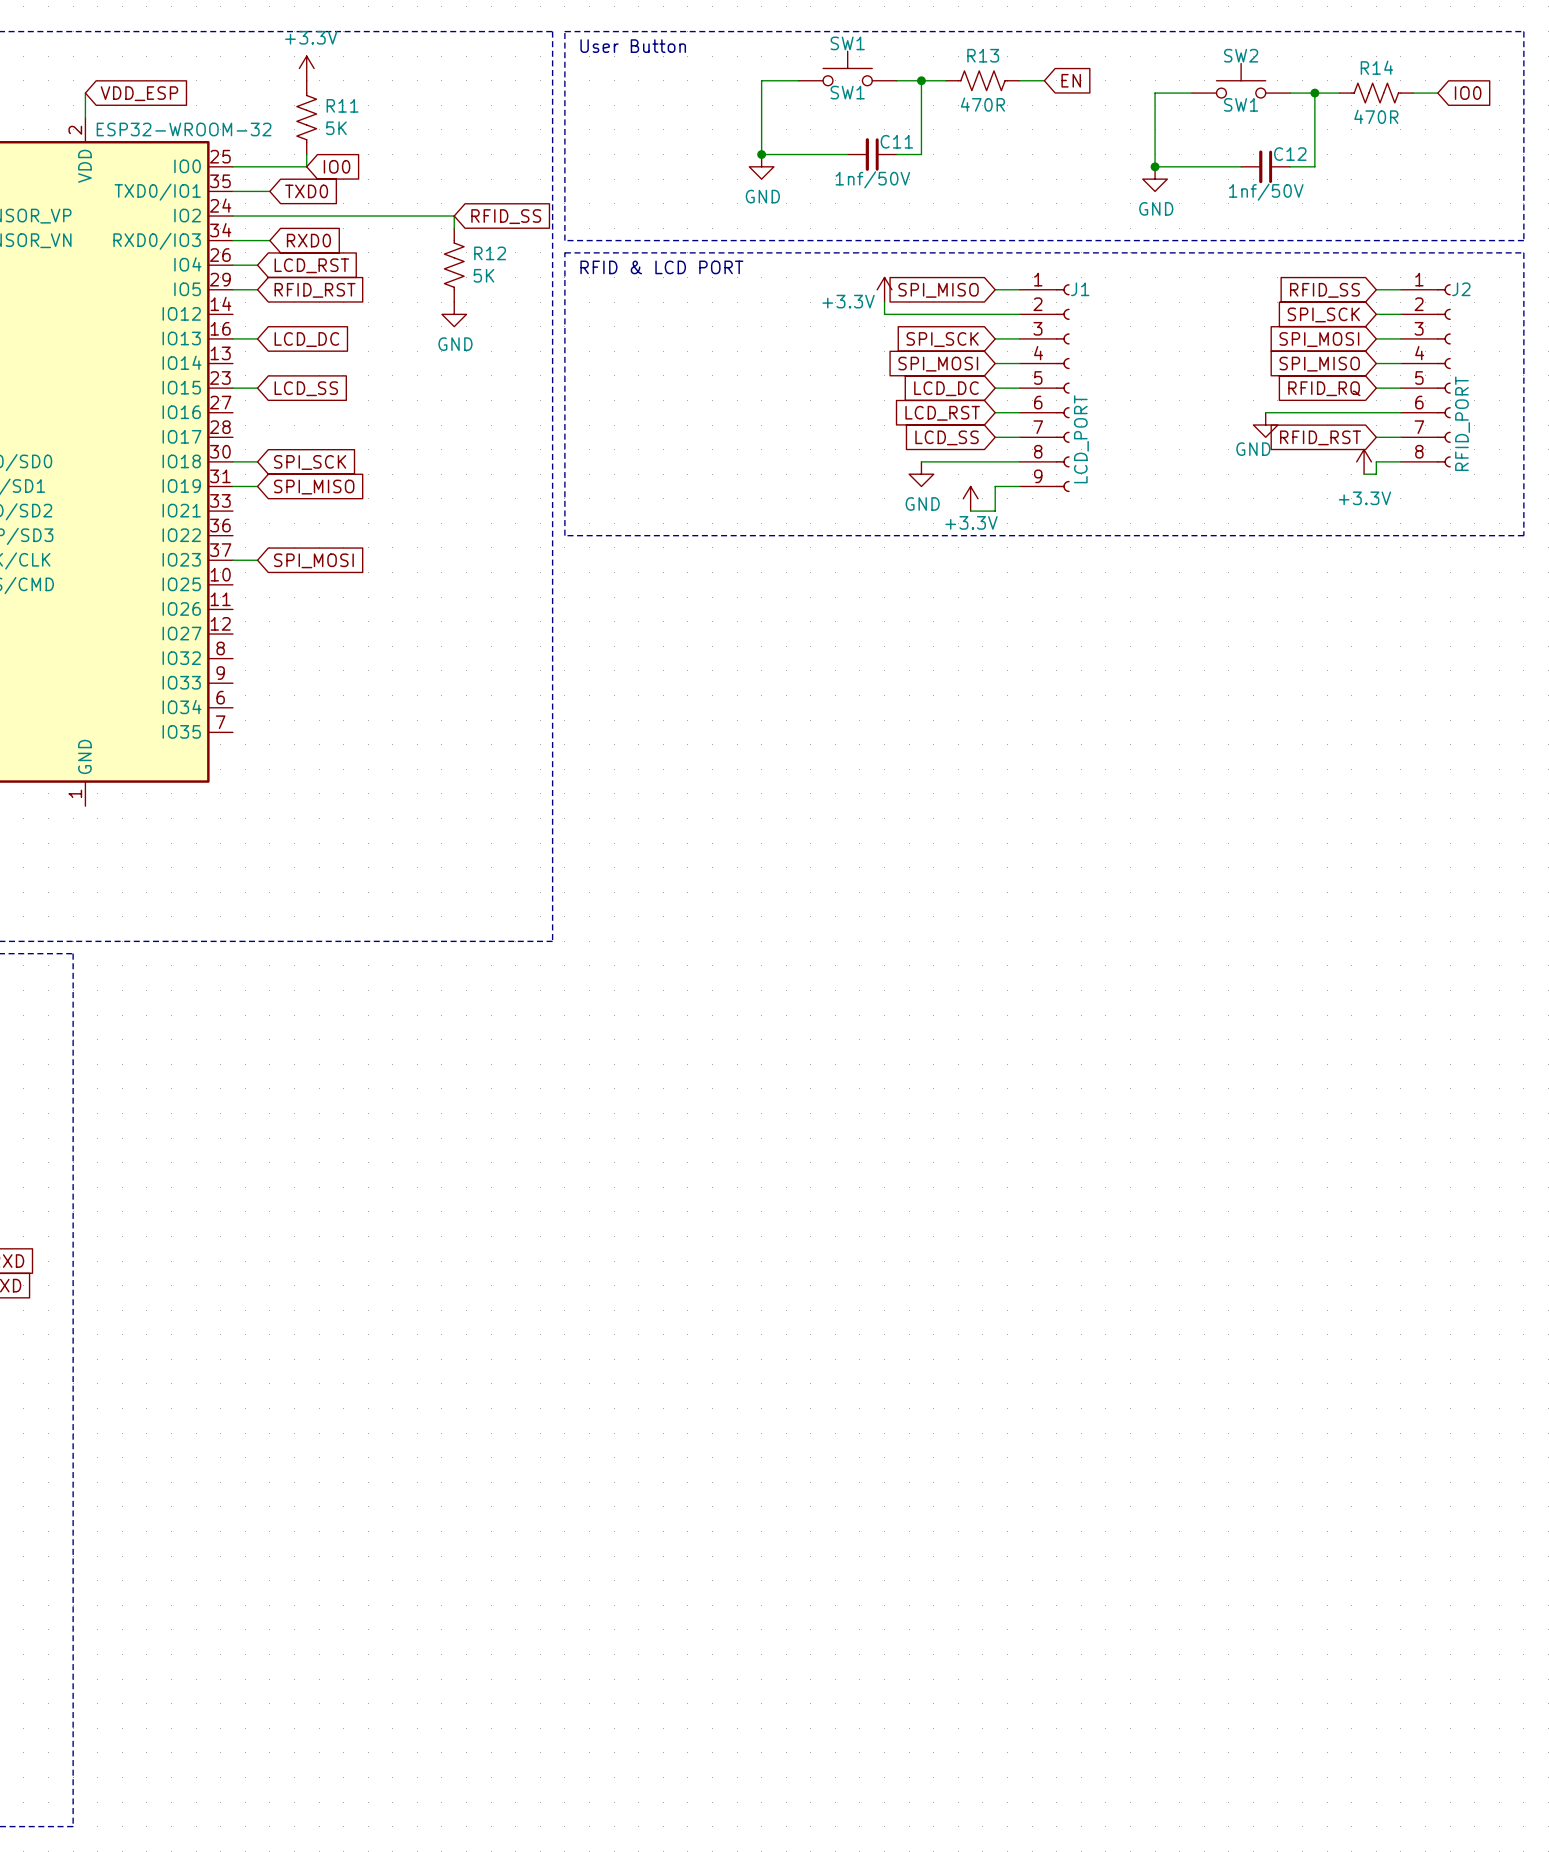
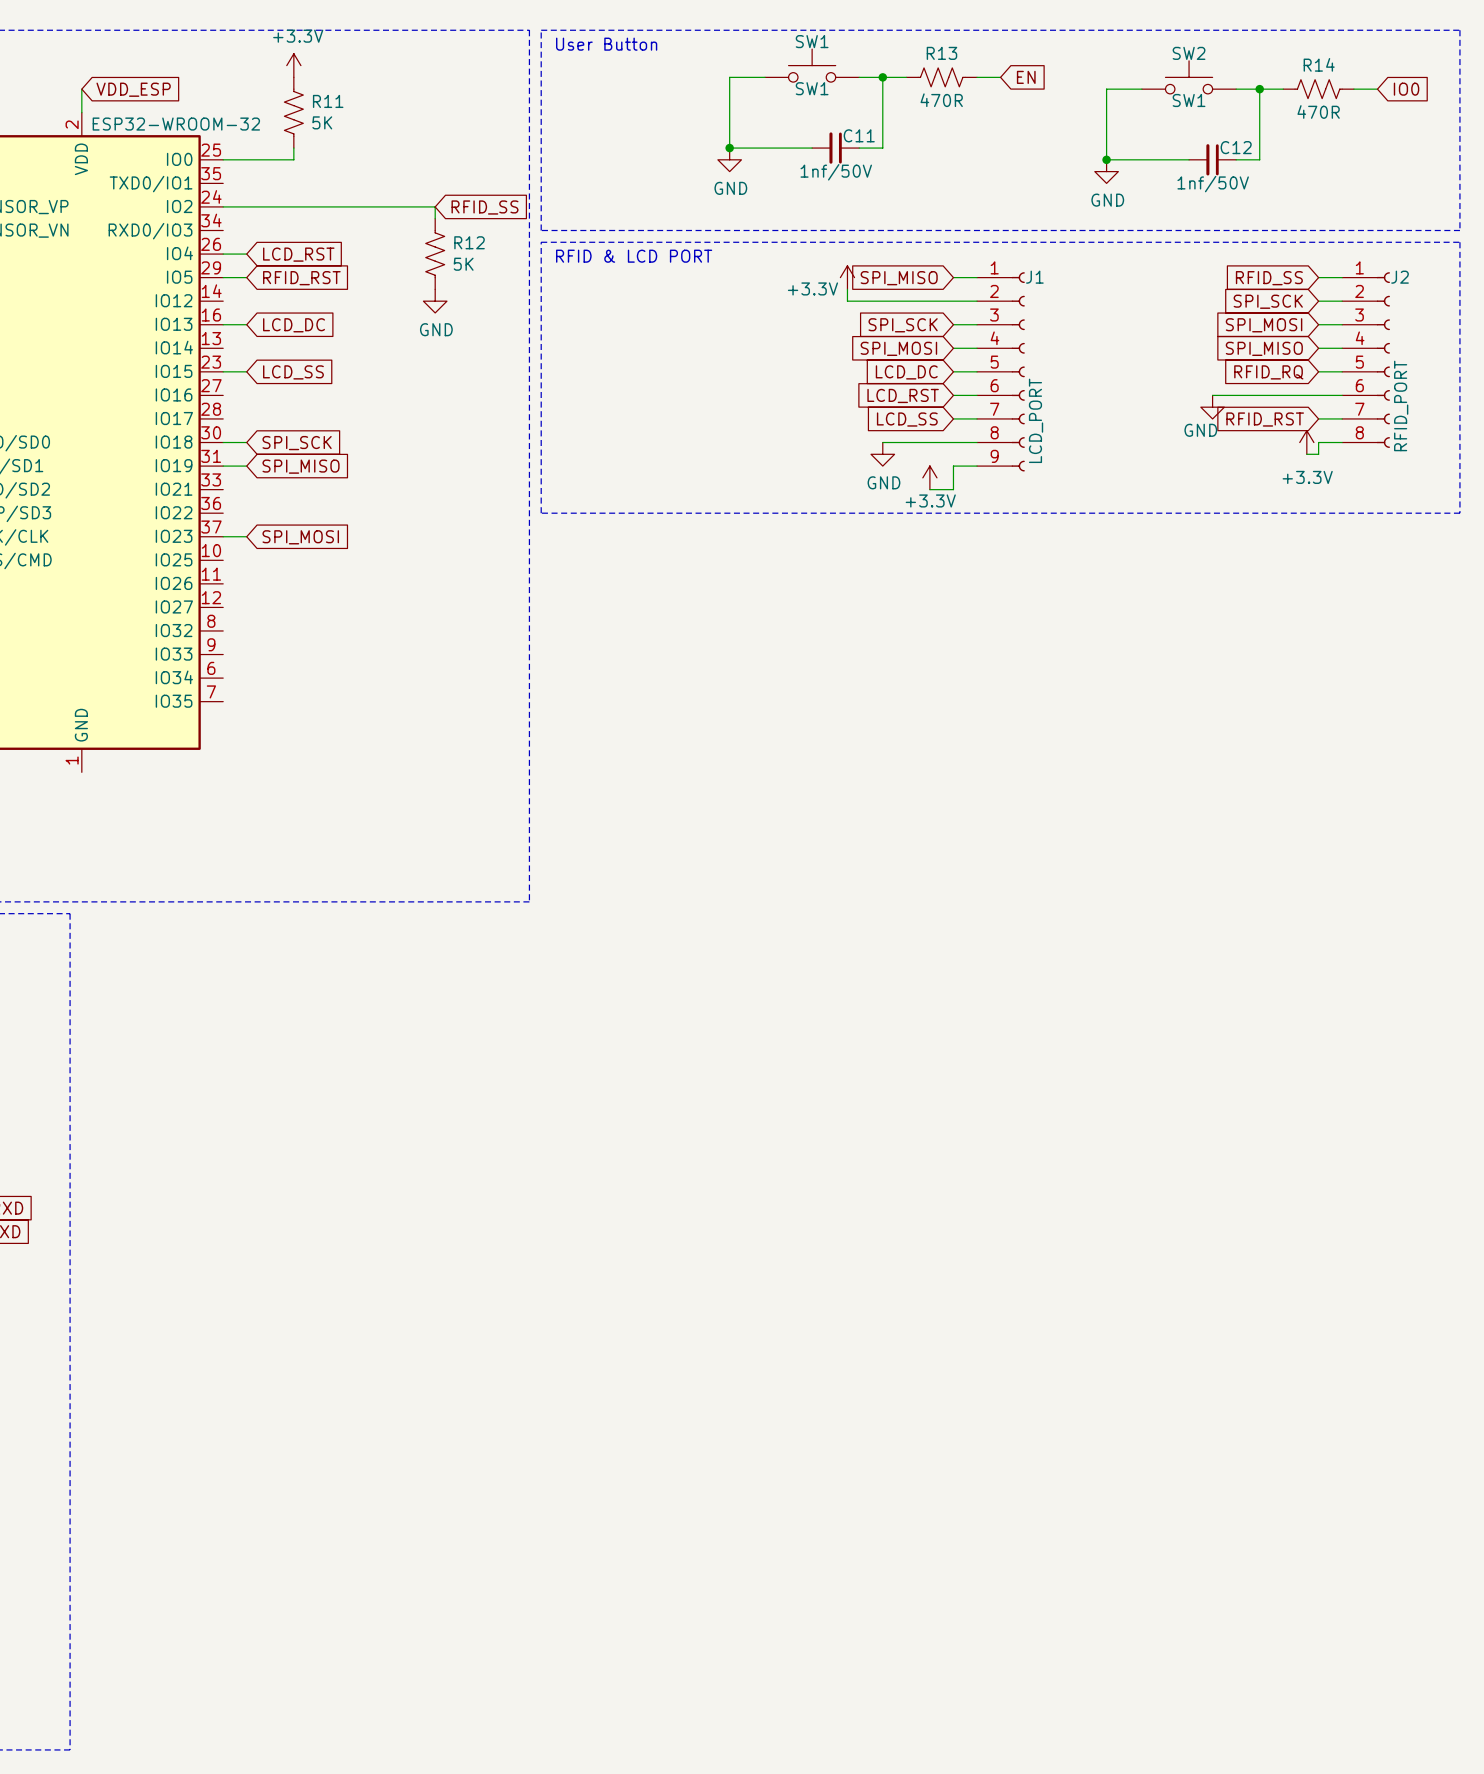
global label: IO0 (337, 166) -> none
wire: (232, 191) (269, 191) -> none
global label: TXD0 (306, 191) -> none
wire: (232, 240) (269, 240) -> none
global label: RXD0 (308, 240) -> none

